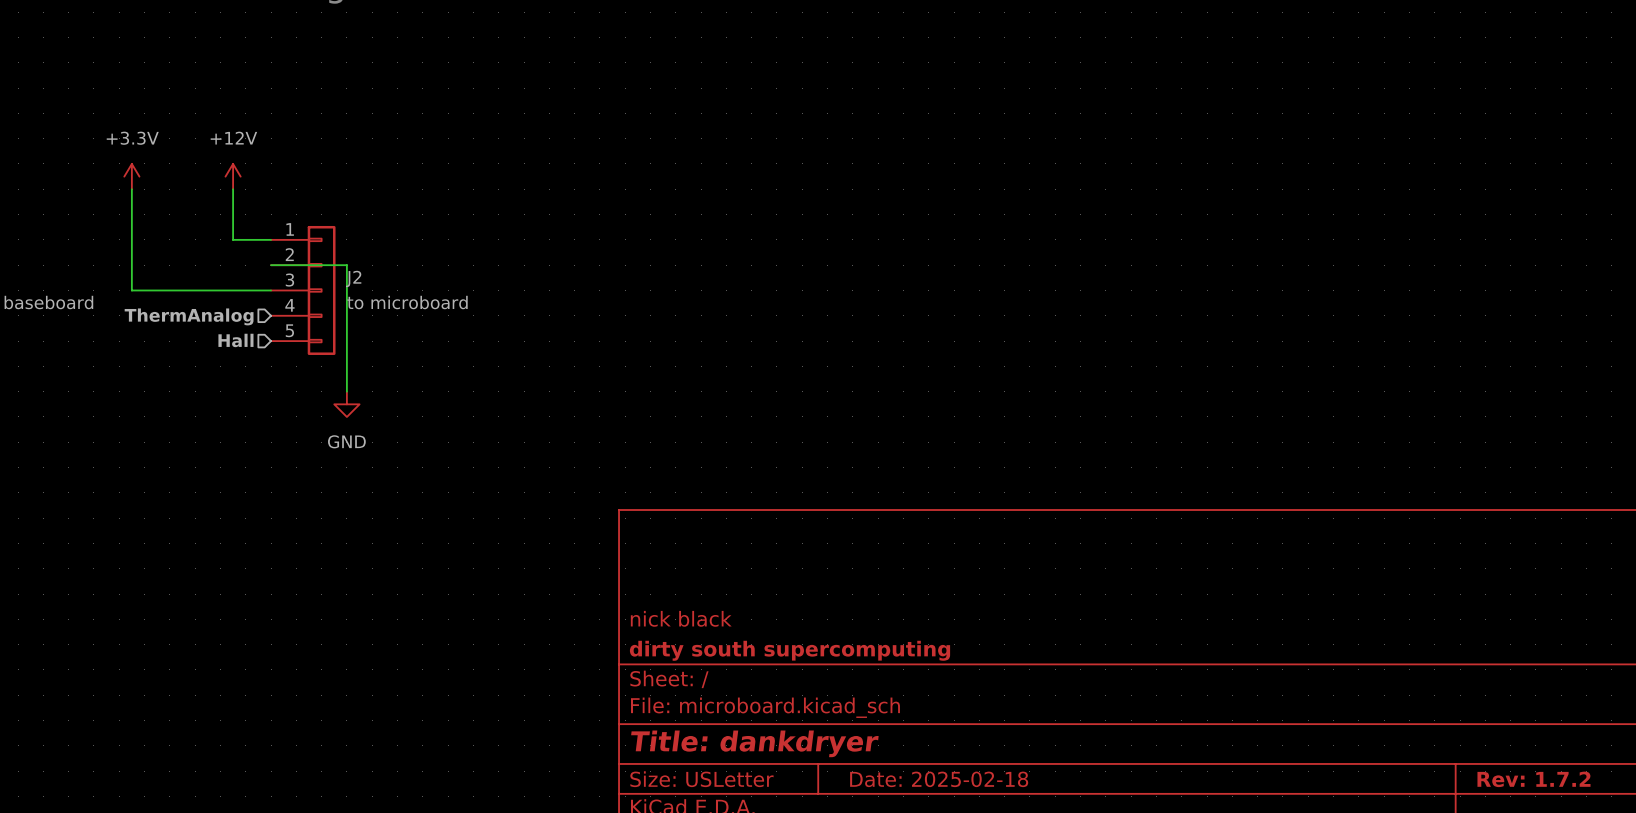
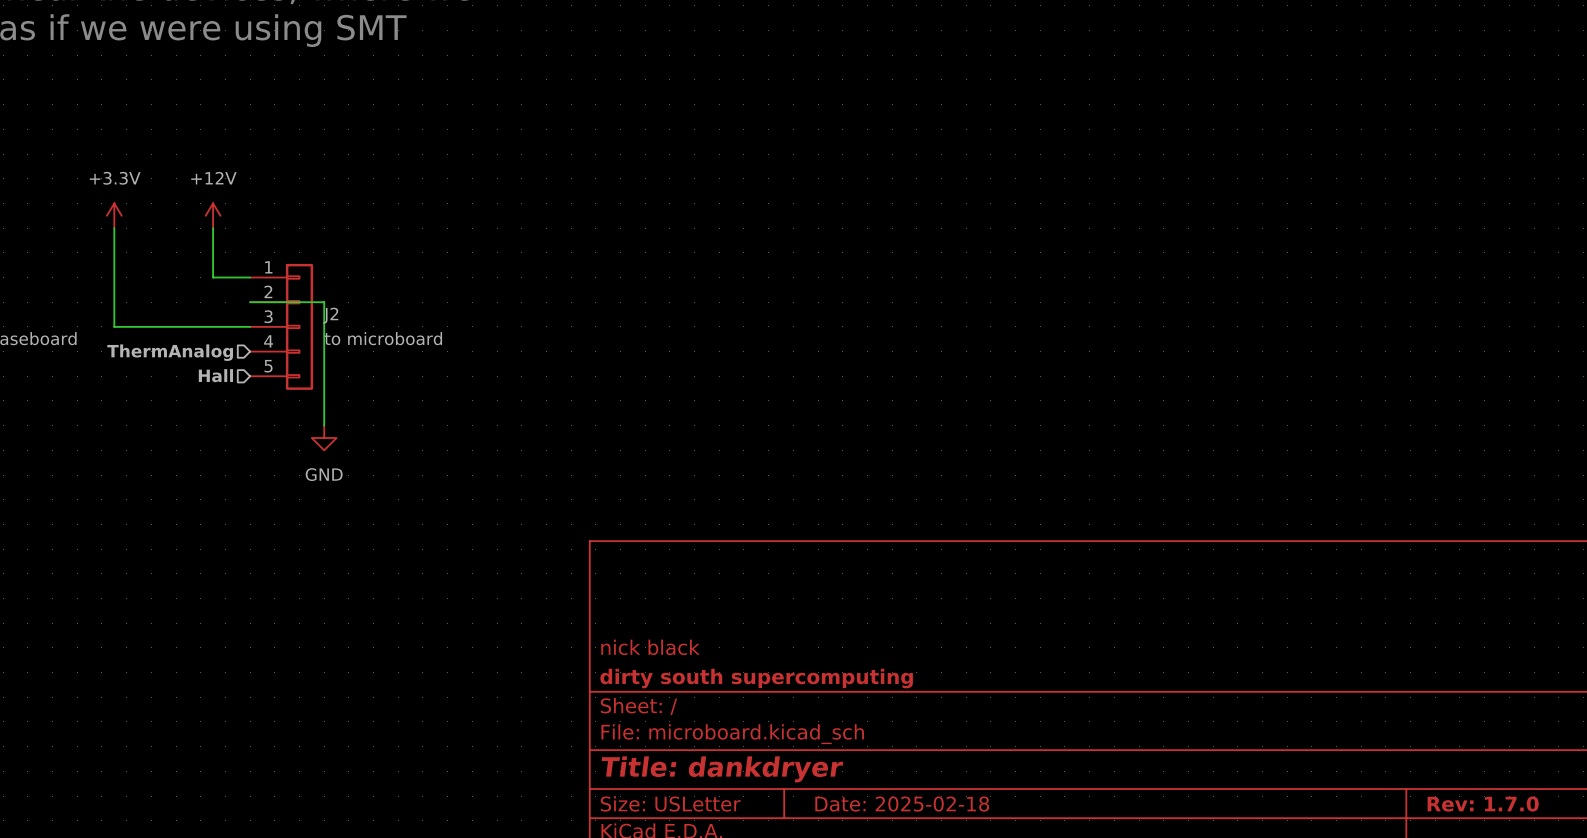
title block: Rev: 1.7.2 (1533, 779) -> Rev: 1.7.0 (1483, 804)

